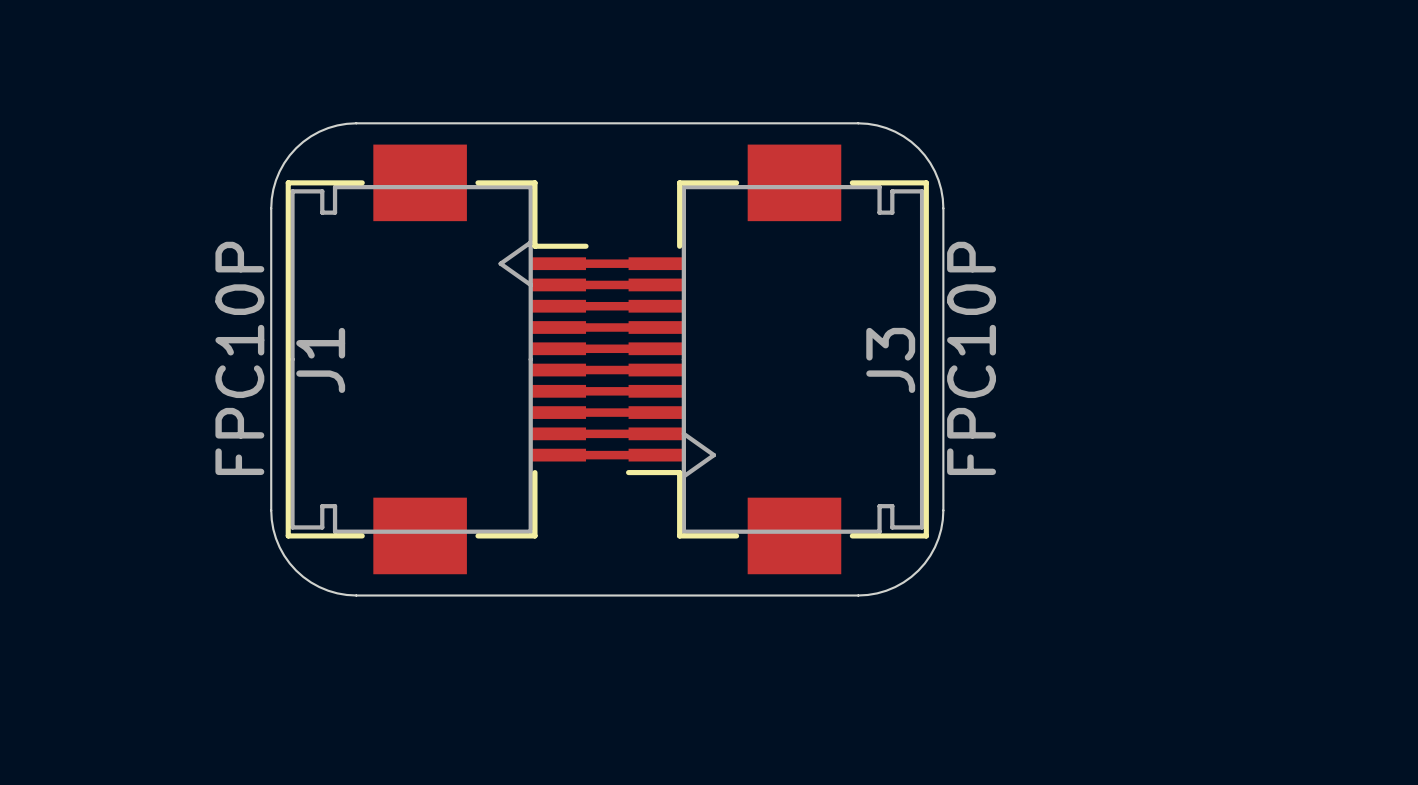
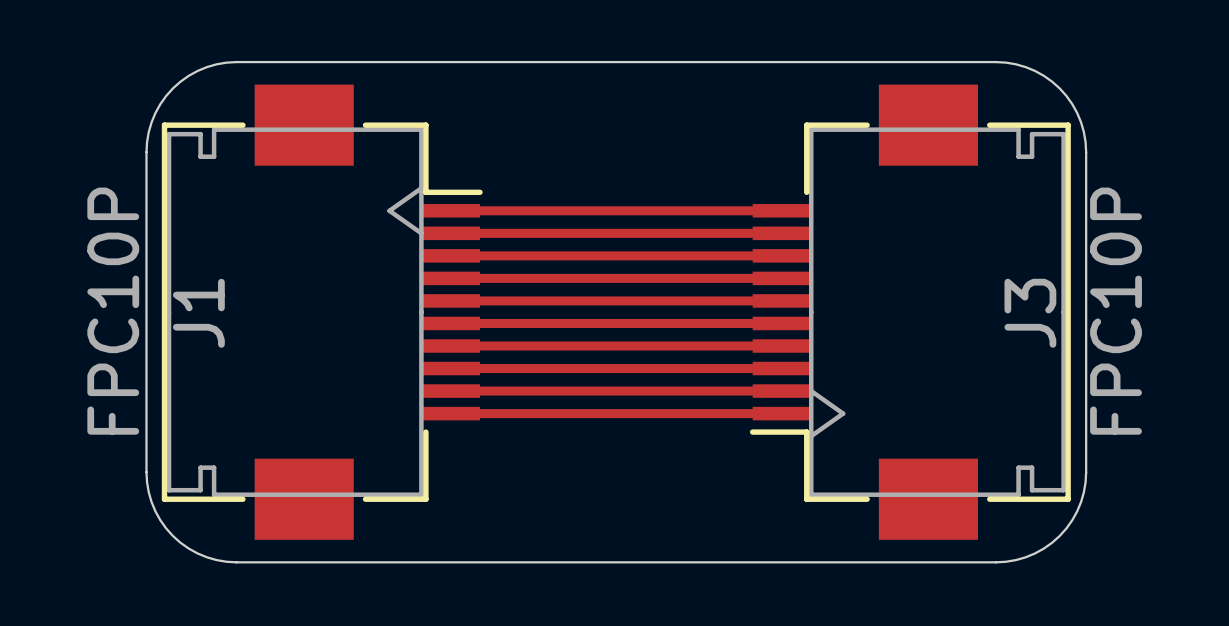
board edge: (858, 123) (877, 125) (895, 131) (918, 148) (930, 163) (938, 180) (943, 208) (943, 510) (941, 529) (930, 555) (911, 576) (886, 590) (858, 595) -> (768, 62) (996, 62) (1016, 64) (1043, 75) (1066, 96) (1081, 122) (1086, 152) (1086, 472) (1081, 501) (1066, 528) (1043, 548) (1025, 557) (1006, 561) (768, 562)
top track: none -> (554, 210) (781, 210)
top track: none -> (554, 233) (781, 233)
top track: none -> (554, 255) (781, 255)
top track: none -> (554, 278) (781, 278)
top track: none -> (554, 300) (781, 300)
J3 position: (777, 359) -> (910, 312)
top track: none -> (554, 323) (781, 323)
top track: none -> (554, 346) (781, 346)
top track: none -> (554, 368) (781, 368)
top track: none -> (554, 391) (781, 391)
top track: none -> (554, 413) (781, 413)

